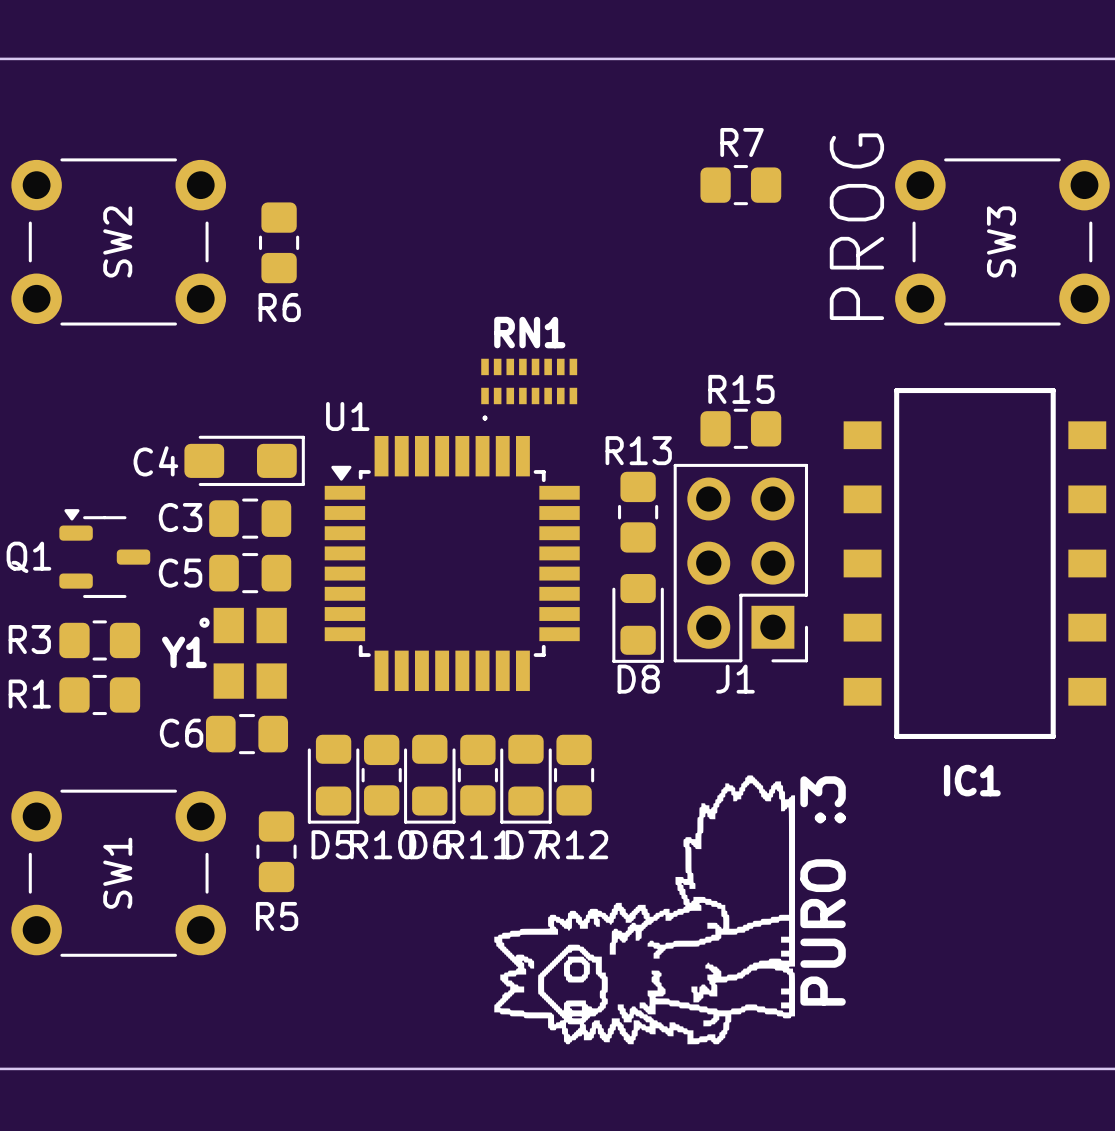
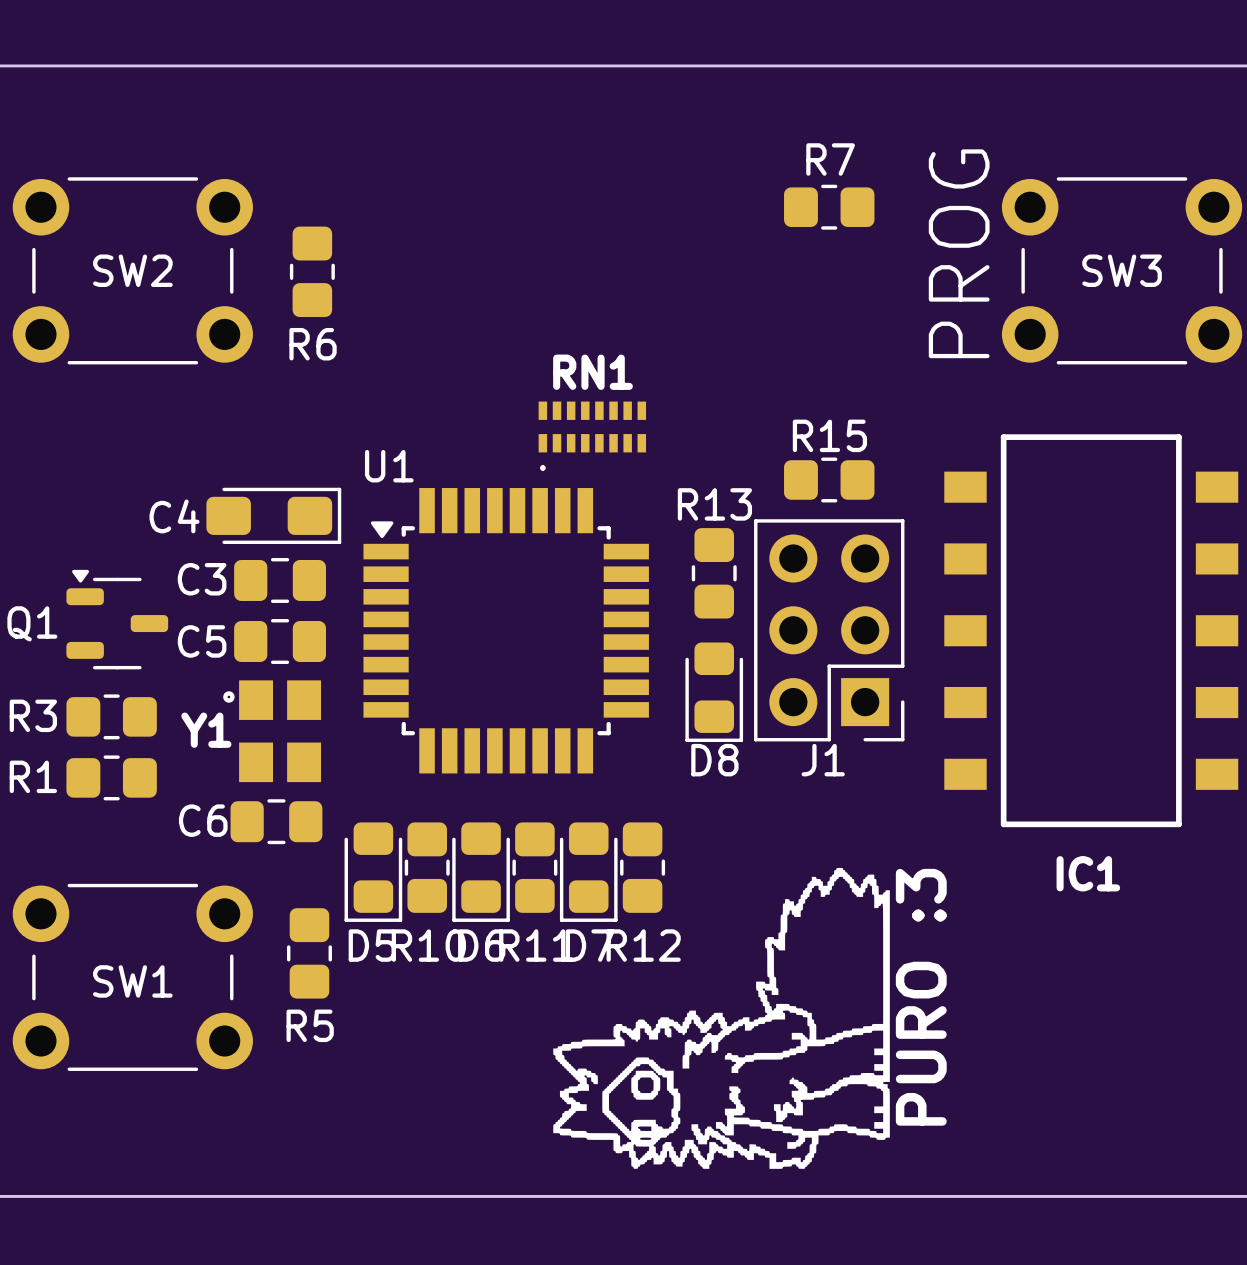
SW2 name rotation: 0° (117, 241) -> 90° clockwise (132, 270)
SW3 name rotation: 0° (1001, 241) -> 90° clockwise (1122, 270)
SW1 name rotation: 0° (117, 873) -> 90° clockwise (132, 981)

